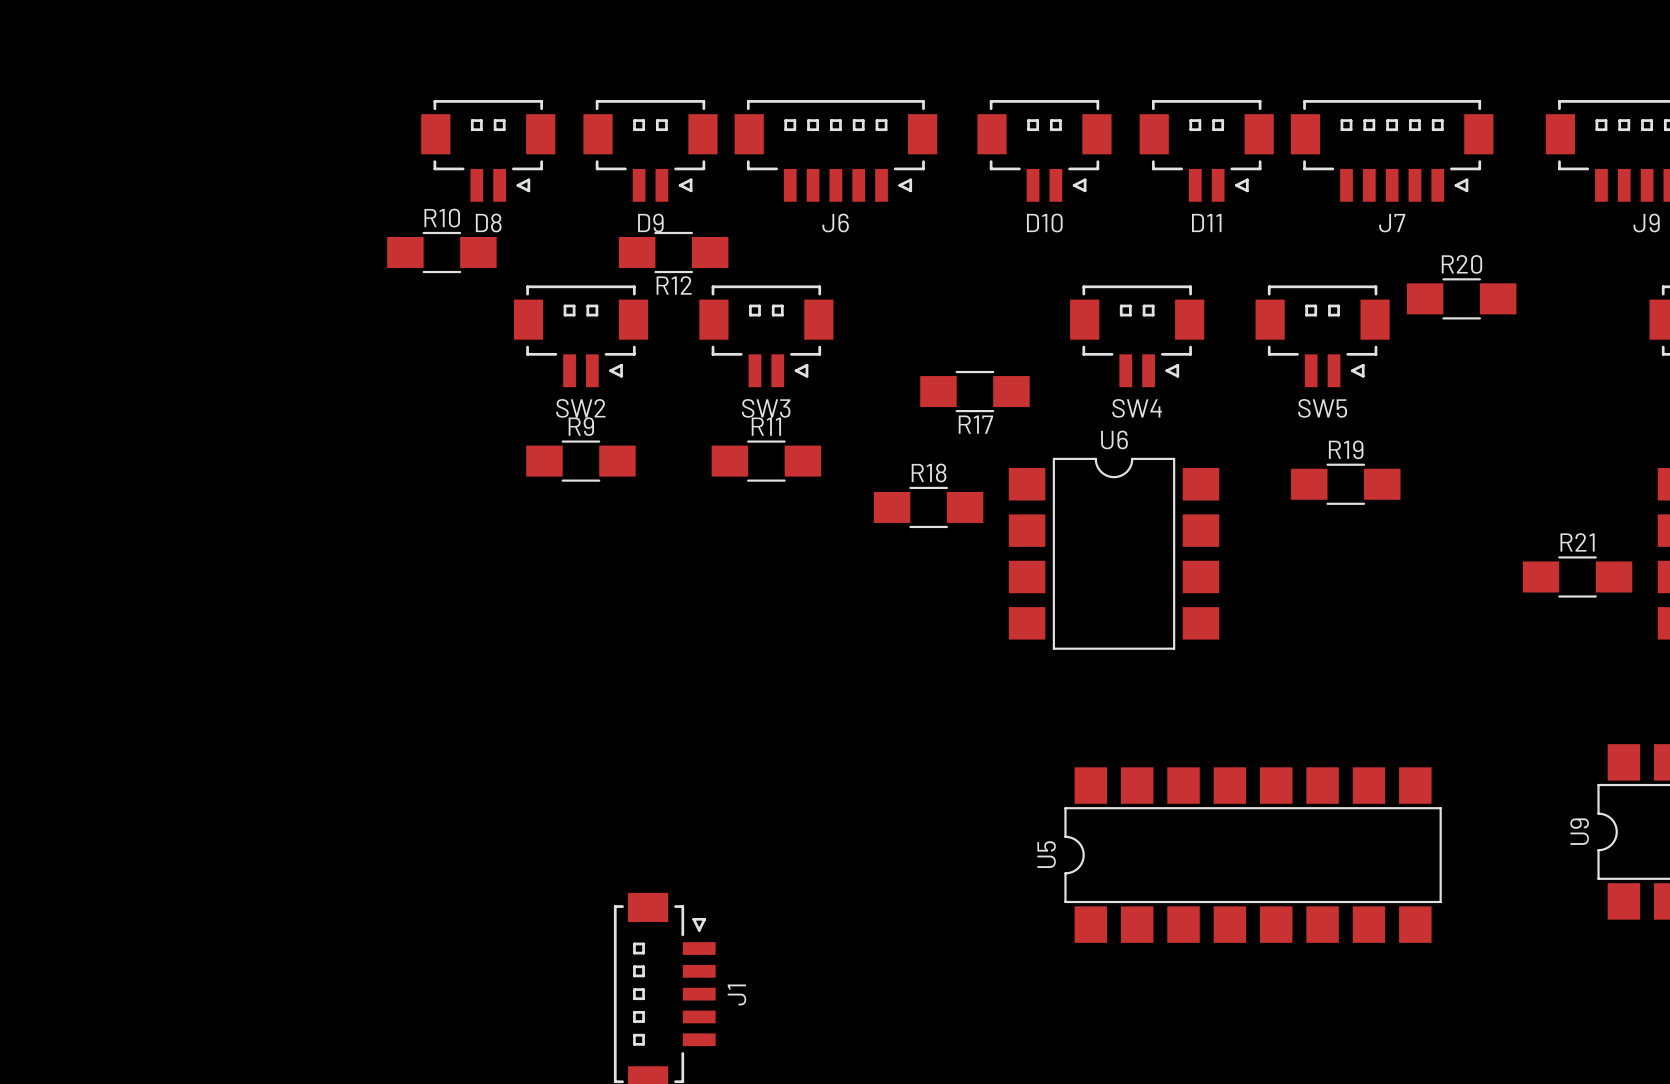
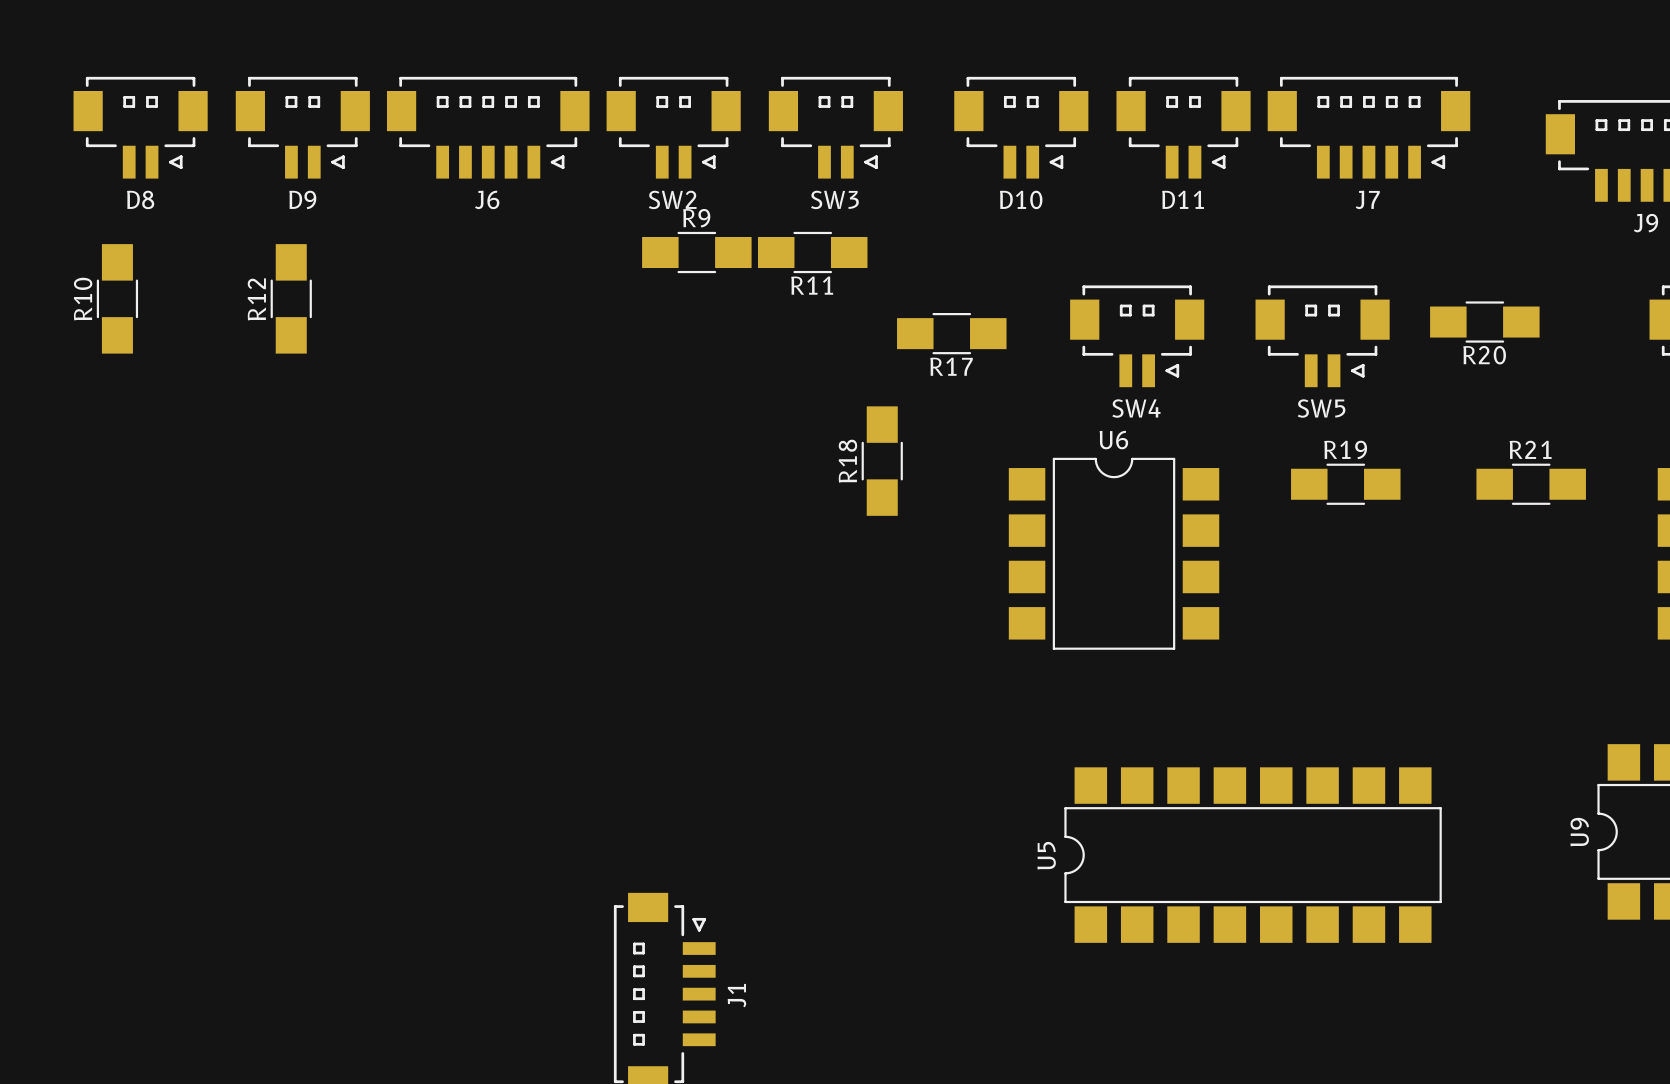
D8 position: (488, 150) -> (140, 127)
D9 position: (650, 150) -> (302, 127)
J6 position: (835, 150) -> (488, 127)
D10 position: (1044, 150) -> (1021, 127)
D11 position: (1206, 150) -> (1183, 127)
J7 position: (1392, 150) -> (1368, 127)
R10 name position: R10 (442, 218) -> R10 (83, 299)
R10 rotation: 0° (441, 252) -> 90° clockwise (117, 298)
R10 position: (441, 252) -> (117, 298)
R12 rotation: 0° (673, 252) -> 90° clockwise (291, 298)
R12 position: (673, 252) -> (291, 298)
R20 name position: R20 (1461, 264) -> R20 (1484, 355)
R20 position: (1461, 298) -> (1484, 322)
SW2 position: (580, 336) -> (673, 127)
SW3 position: (766, 336) -> (835, 127)
R17 position: (974, 391) -> (951, 333)
R11 name position: R11 (766, 426) -> R11 (812, 285)
R9 position: (580, 461) -> (696, 252)
R11 position: (766, 461) -> (812, 252)
R18 name position: R18 (929, 472) -> R18 (847, 461)
R18 rotation: 0° (928, 507) -> 90° clockwise (882, 461)
R21 position: (1577, 576) -> (1531, 484)

